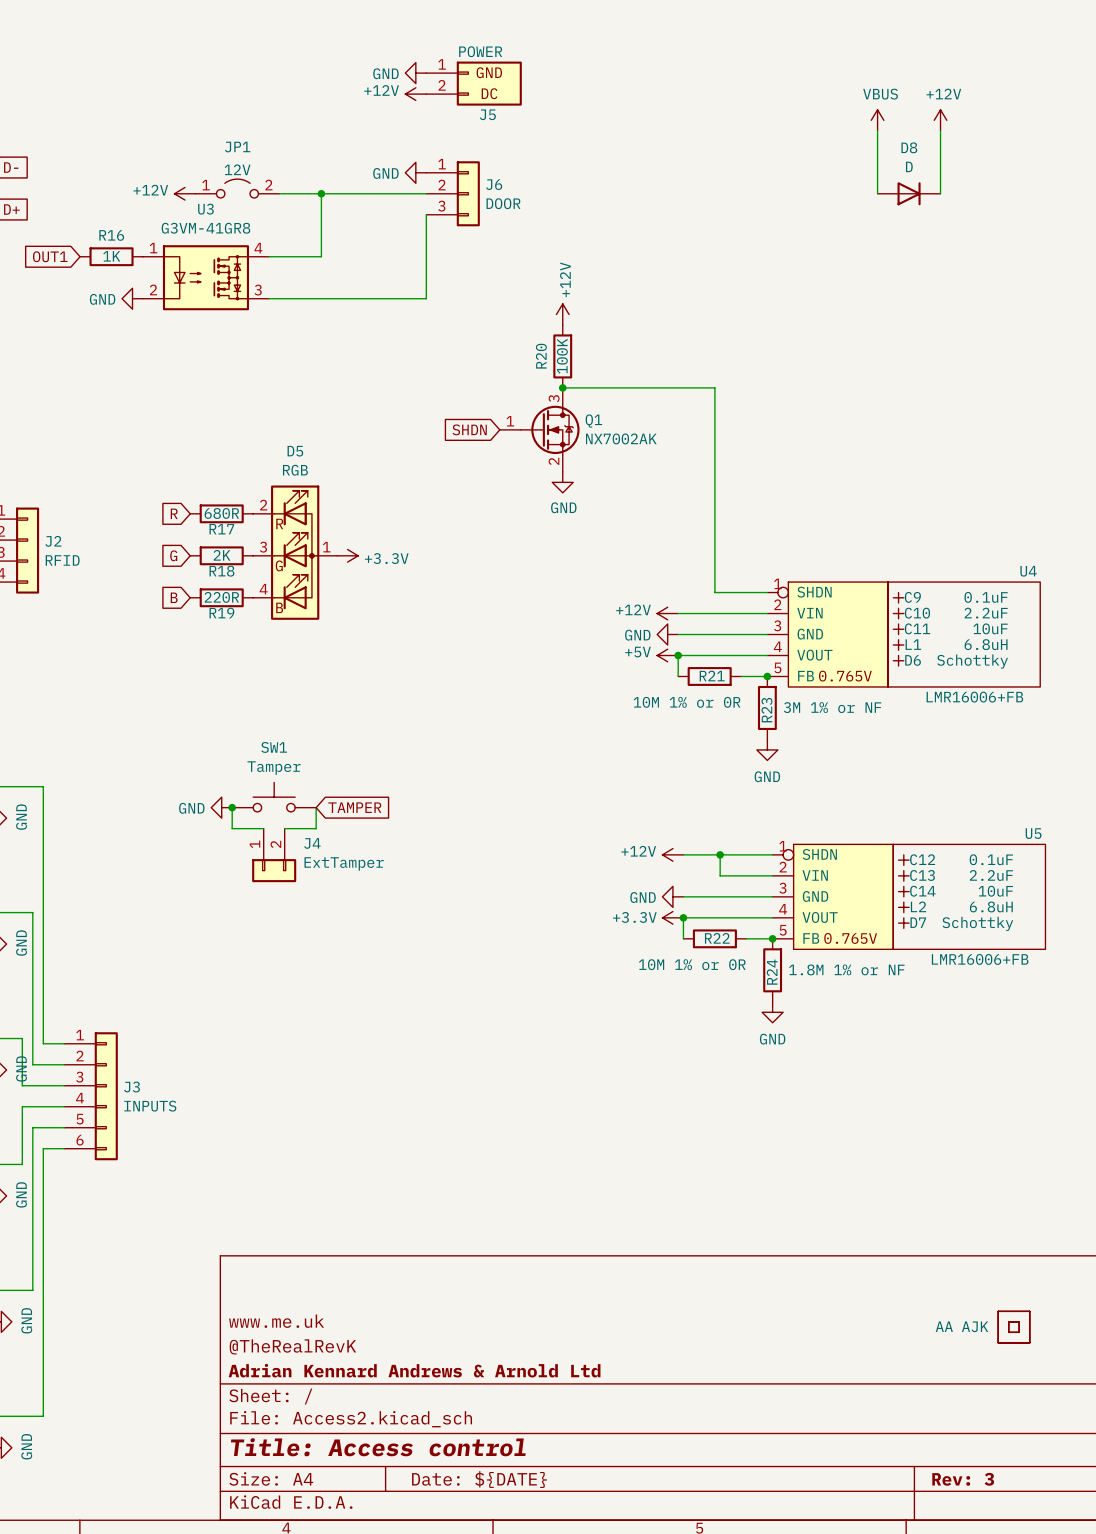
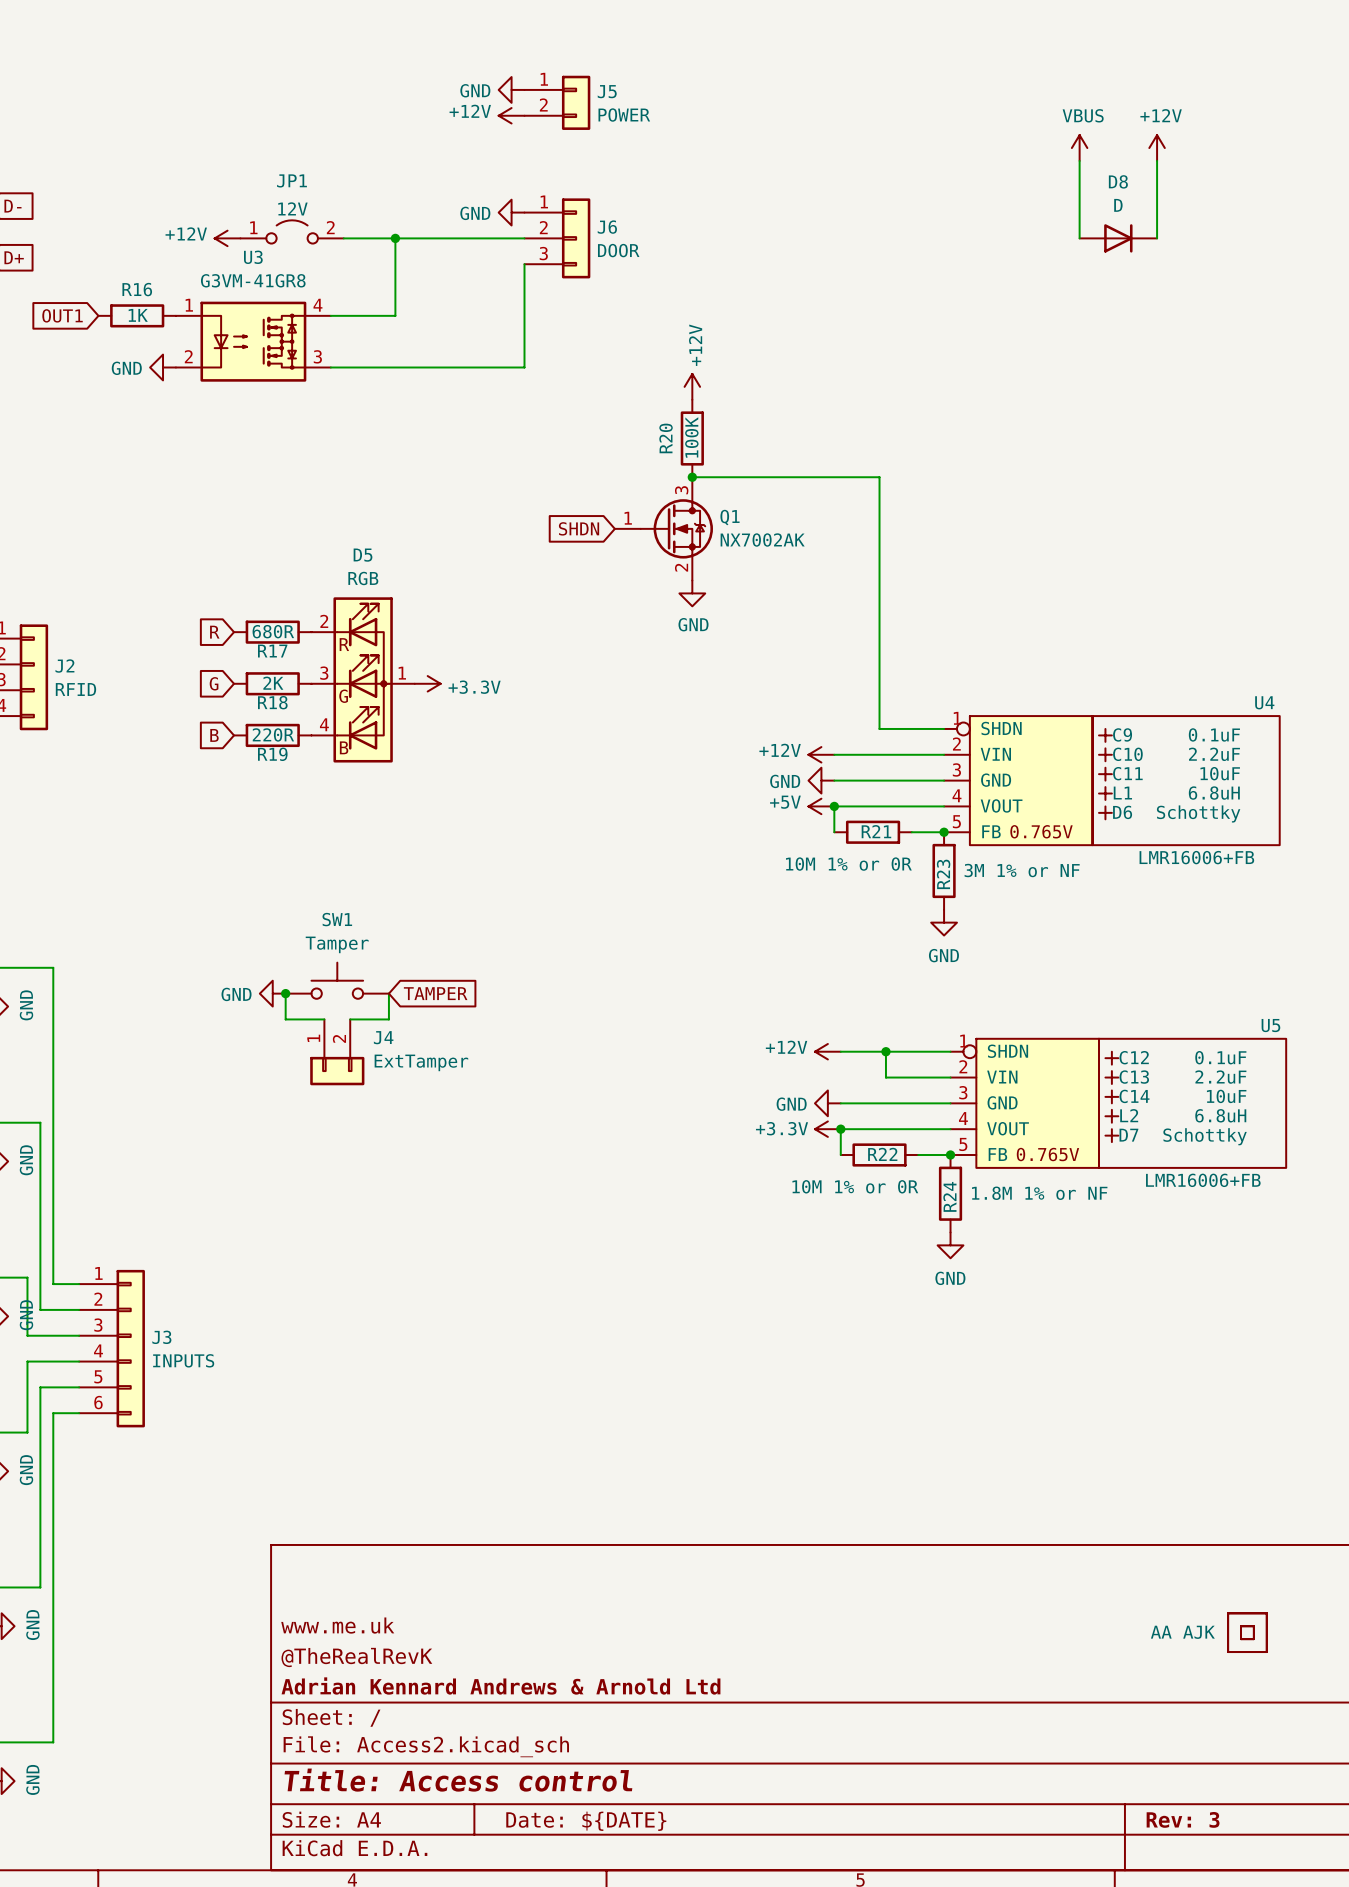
J5 value position: POWER (480, 51) -> POWER (624, 115)
J5 symbol: [426, 61, 522, 106] -> [524, 75, 591, 130]
J5 name position: J5 (487, 114) -> J5 (607, 91)

